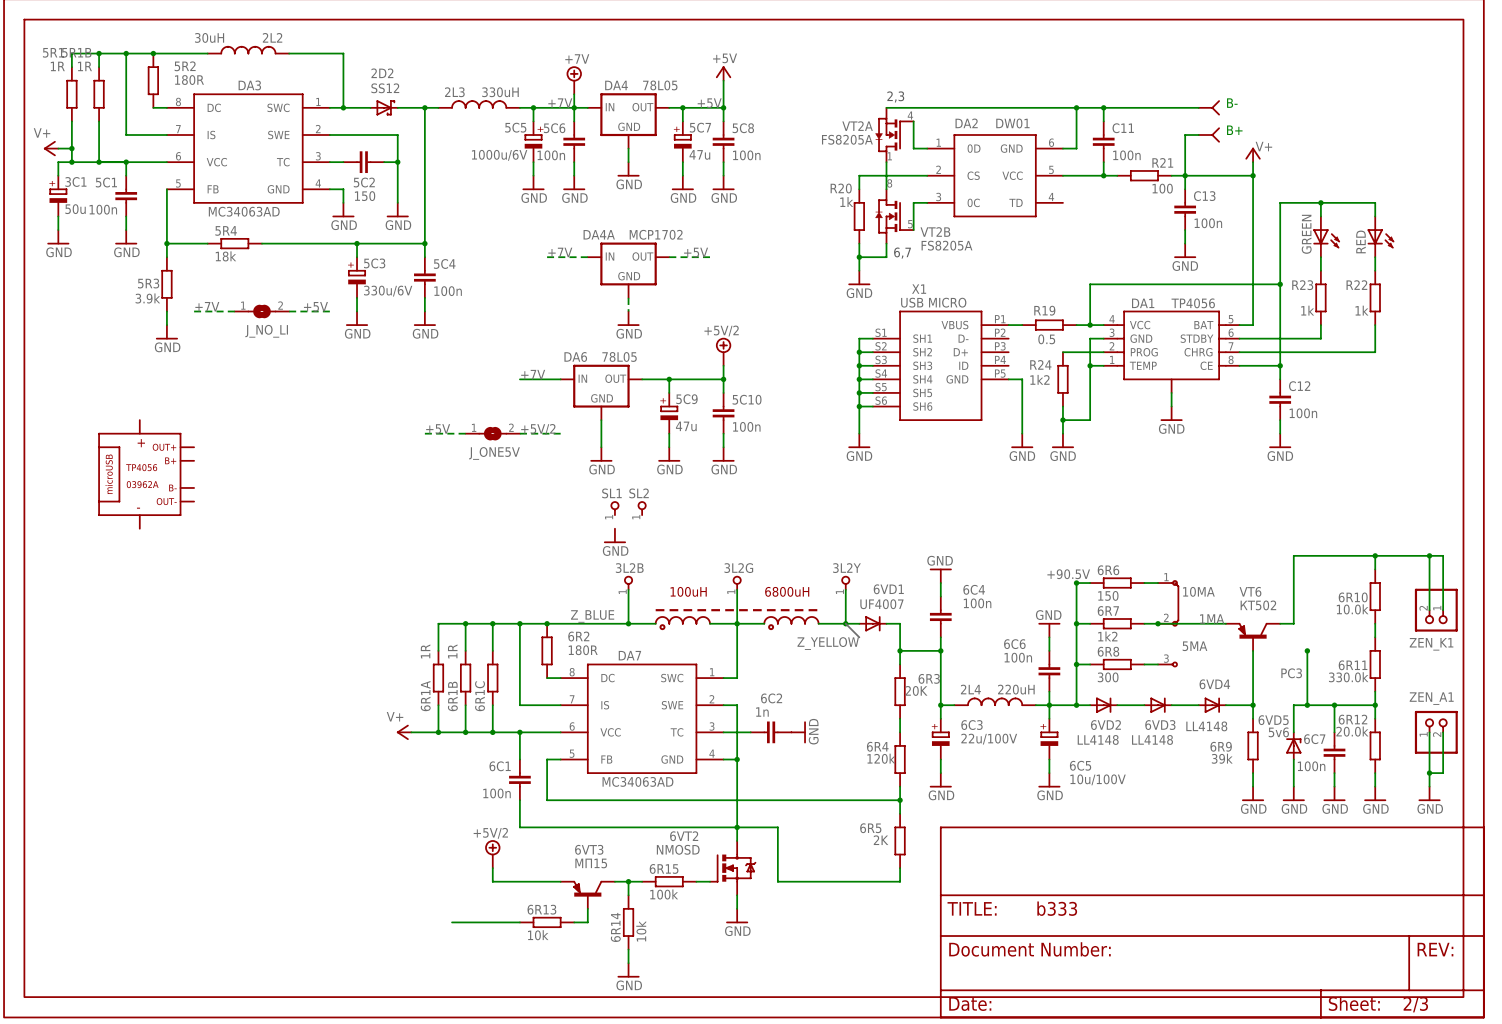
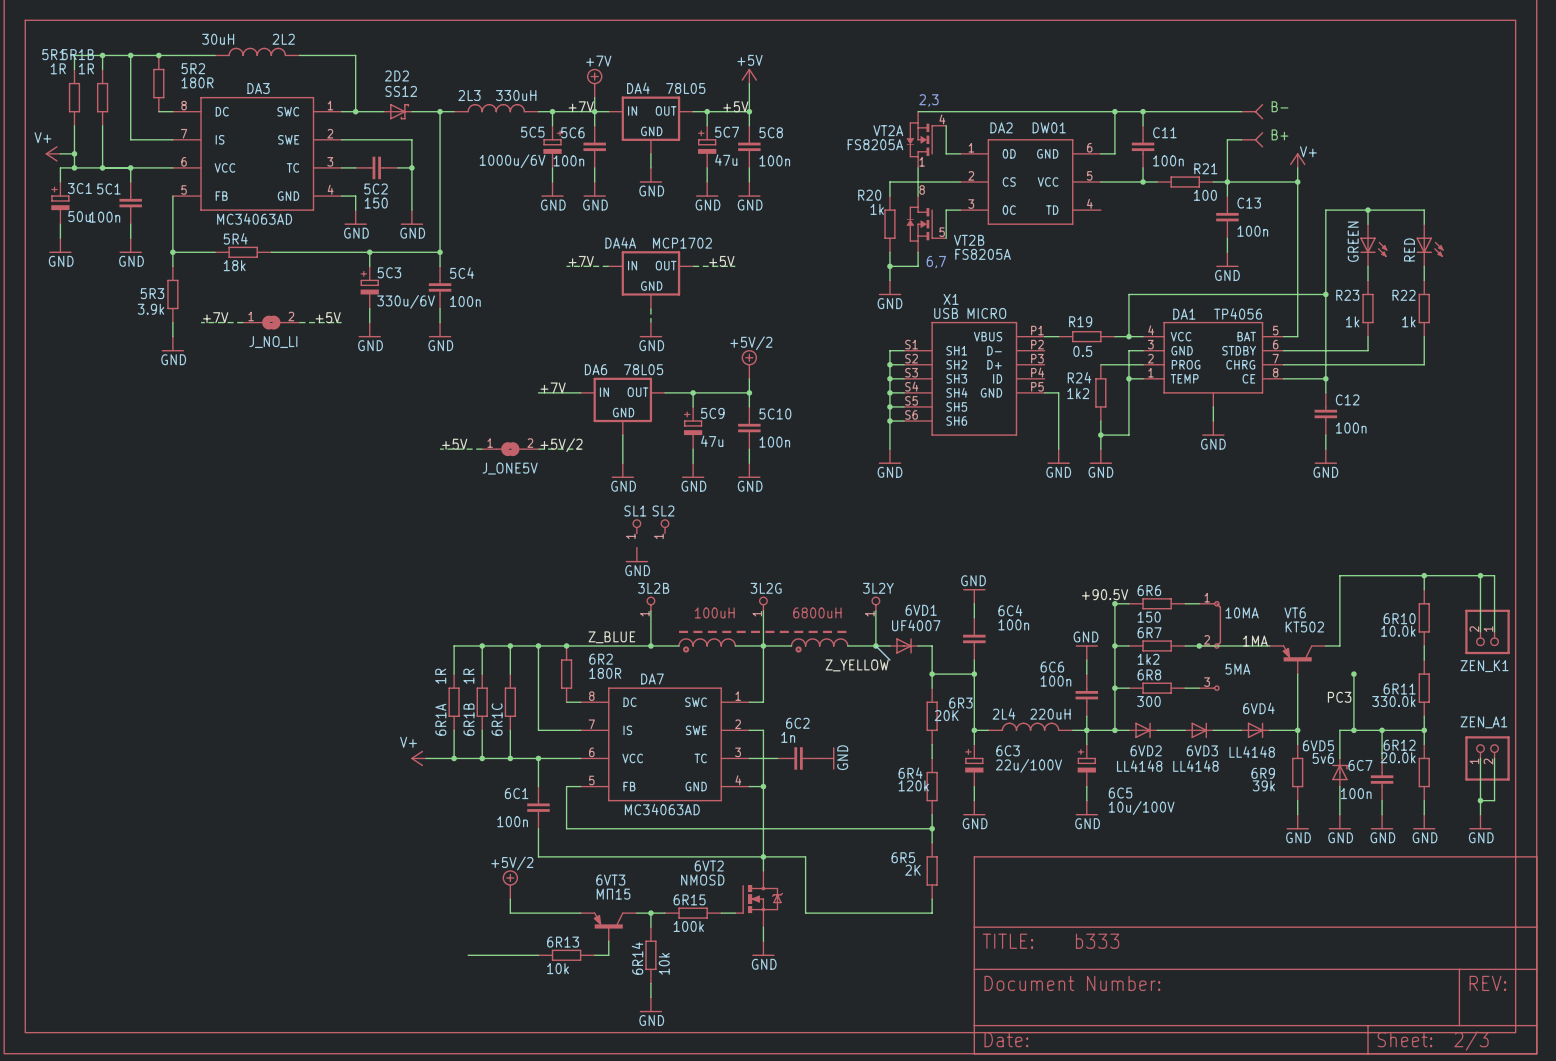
part: (146, 474) -> none

